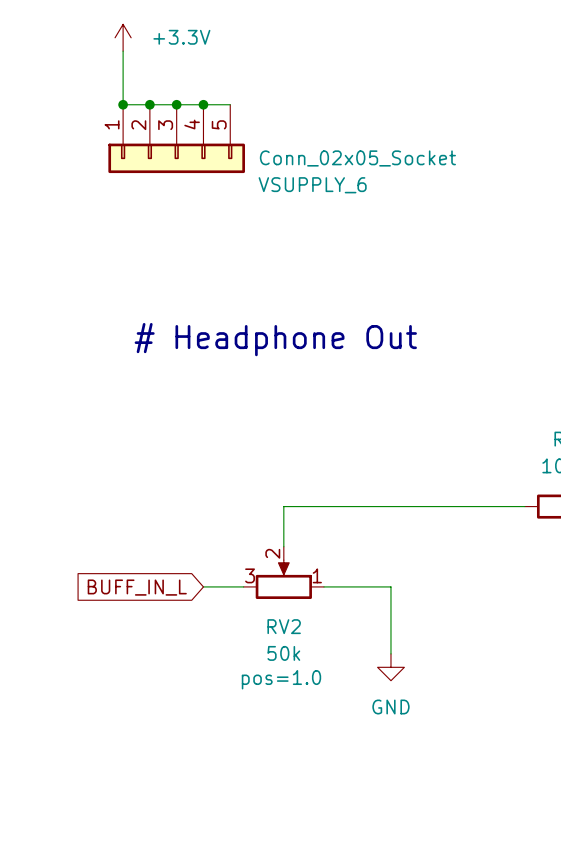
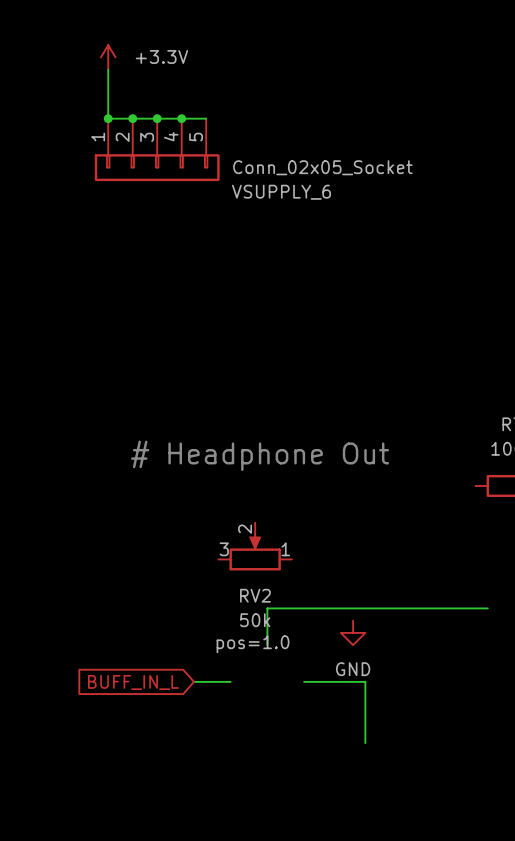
text position: # Headphone Out (275, 339) -> # Headphone Out (260, 455)
wire: (524, 506) (283, 506) (283, 546) -> (487, 608) (267, 608) (267, 645)
wire: (203, 586) (243, 586) -> (193, 681) (230, 681)
wire: (324, 586) (390, 586) (390, 653) -> (304, 681) (365, 681) (365, 743)
global label position: BUFF_IN_L (137, 587) -> BUFF_IN_L (133, 682)

